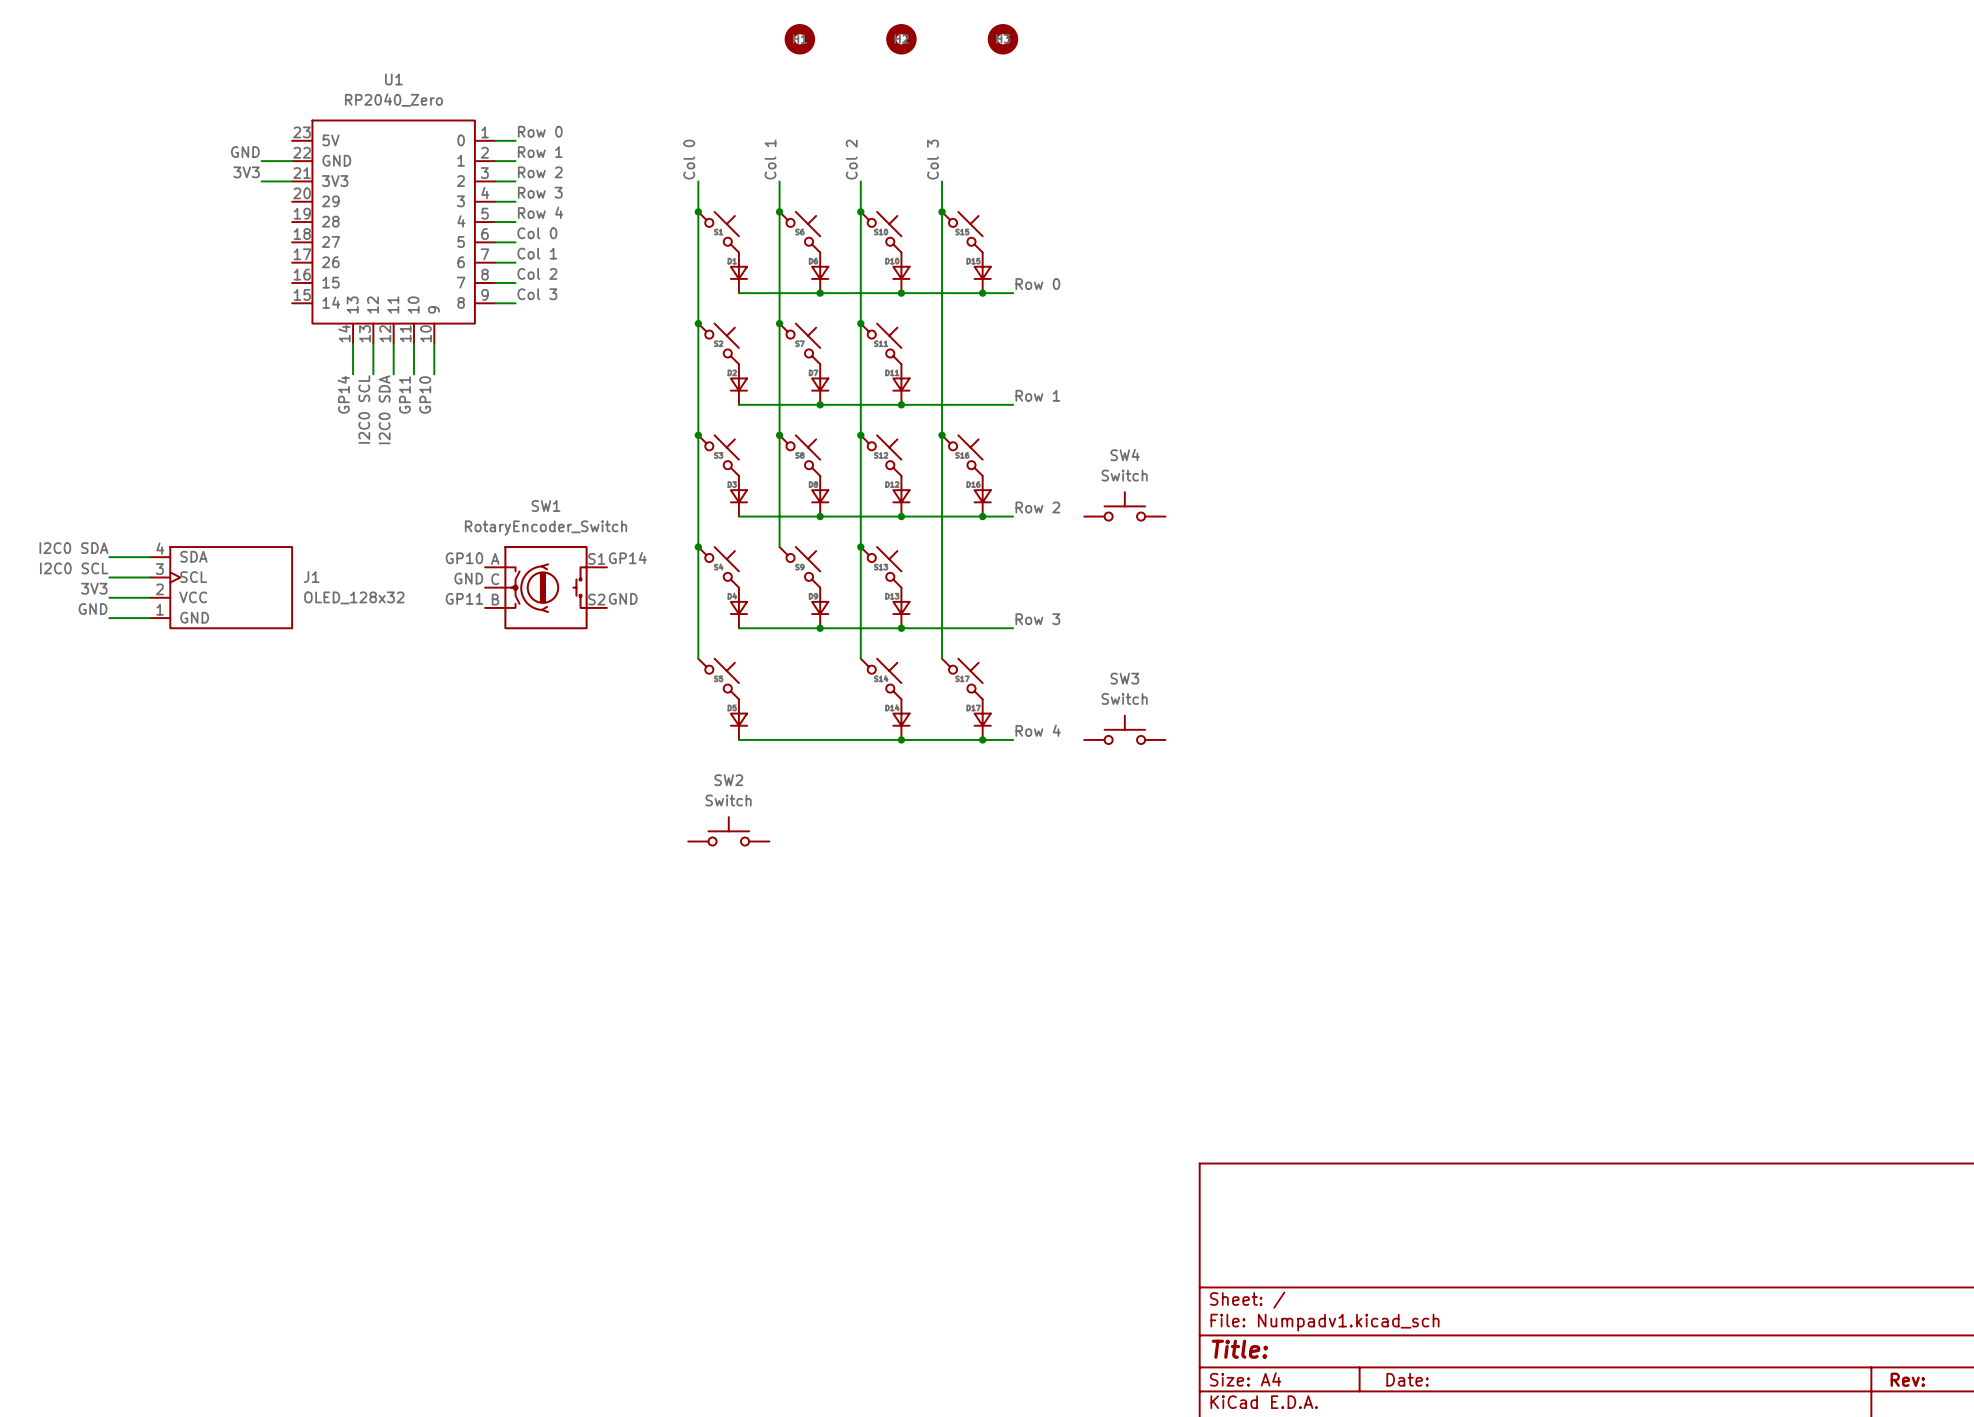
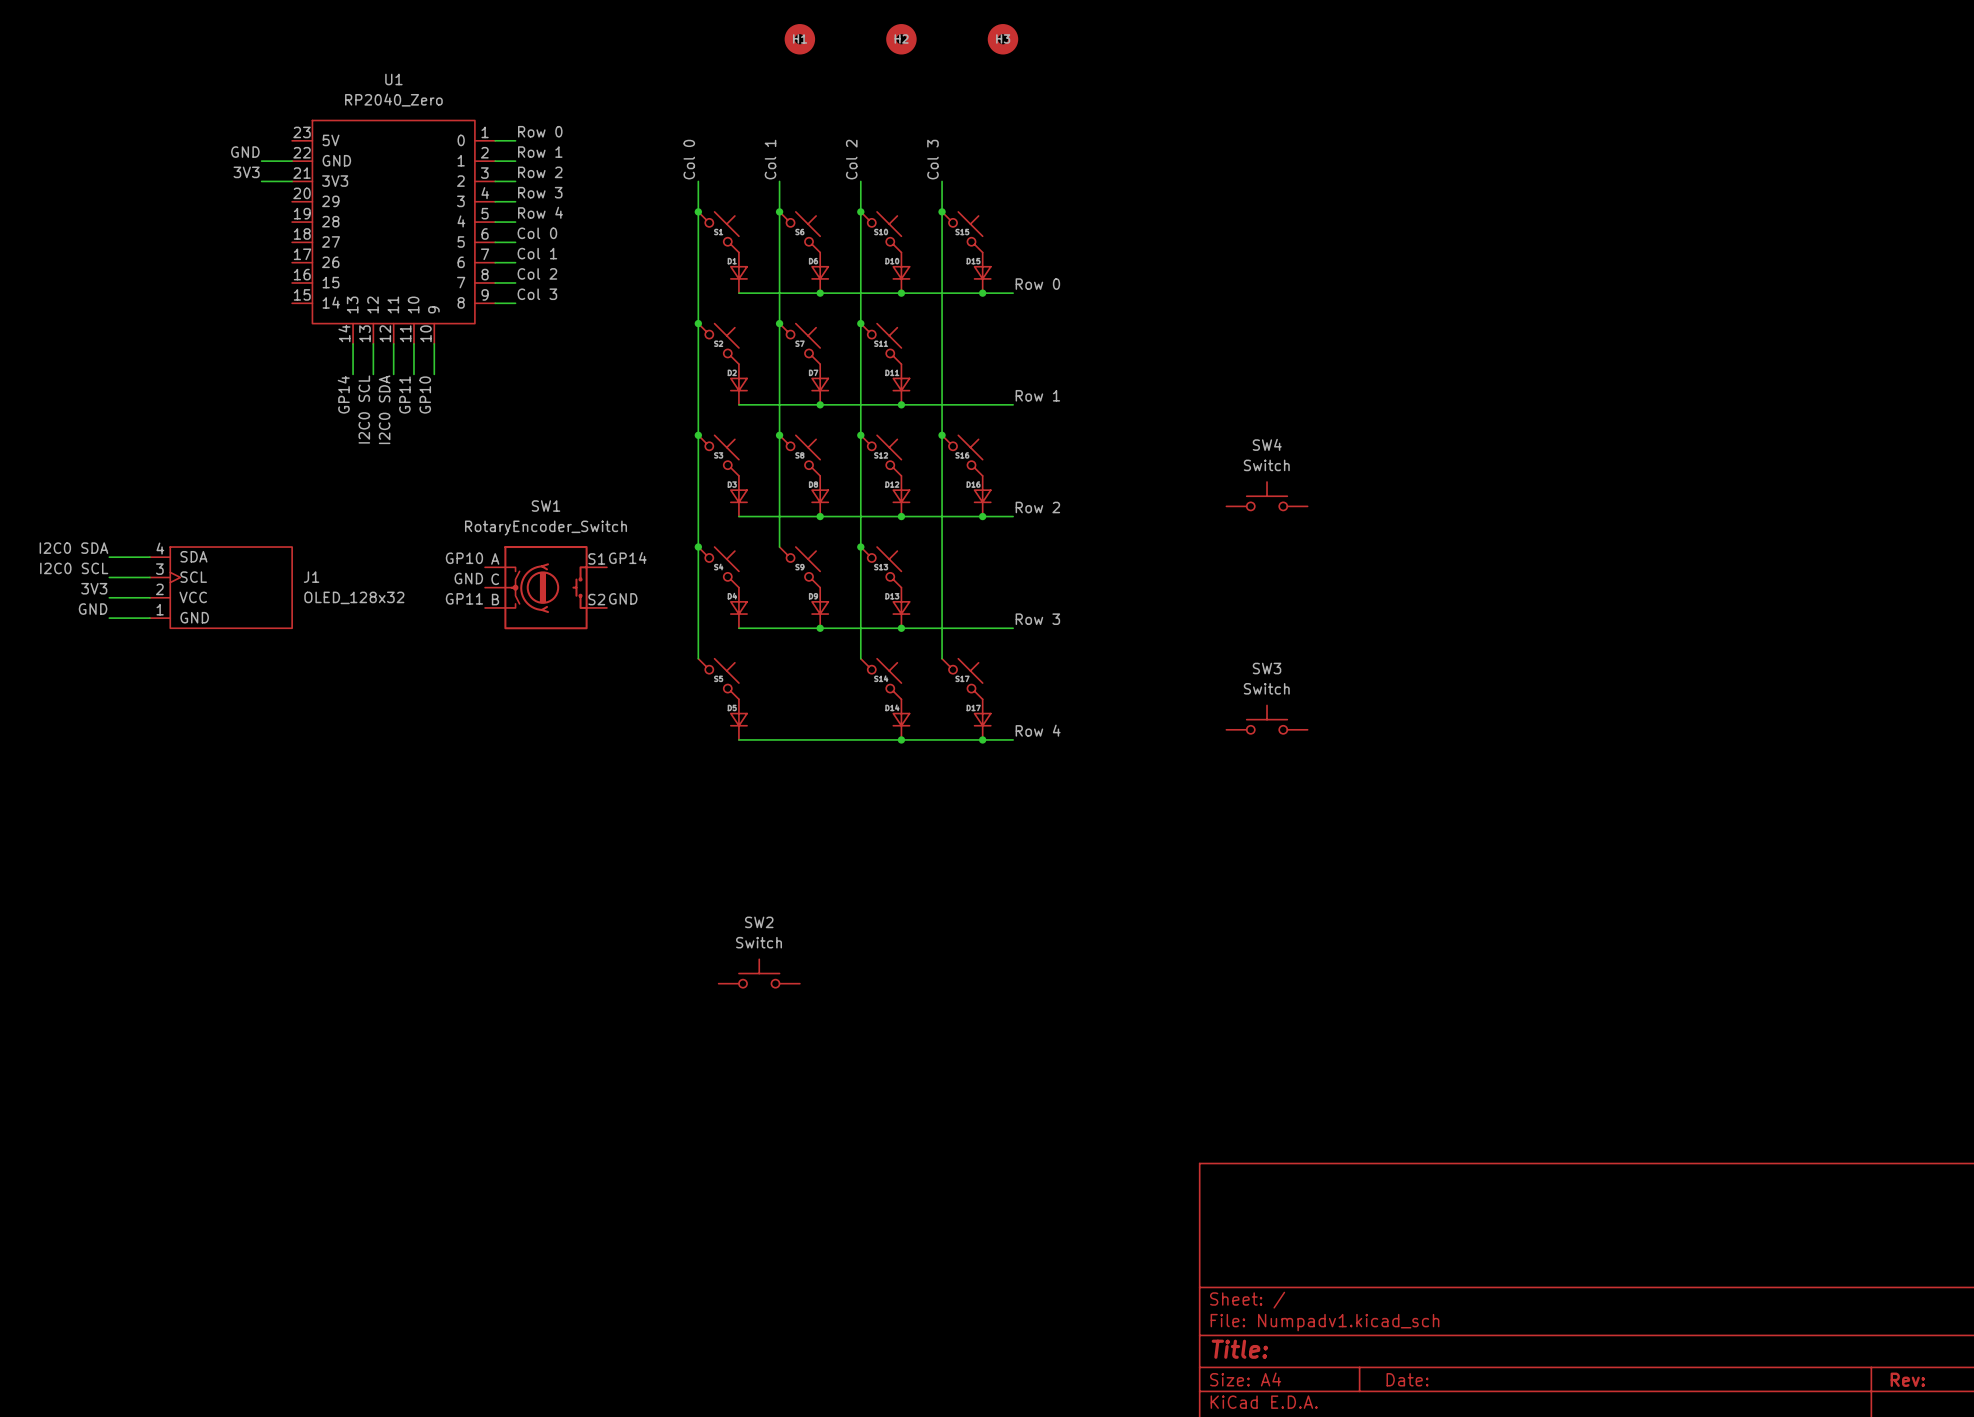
SW4 position: (1124, 506) -> (1267, 496)
SW3 position: (1124, 729) -> (1267, 719)
SW2 position: (728, 831) -> (759, 973)

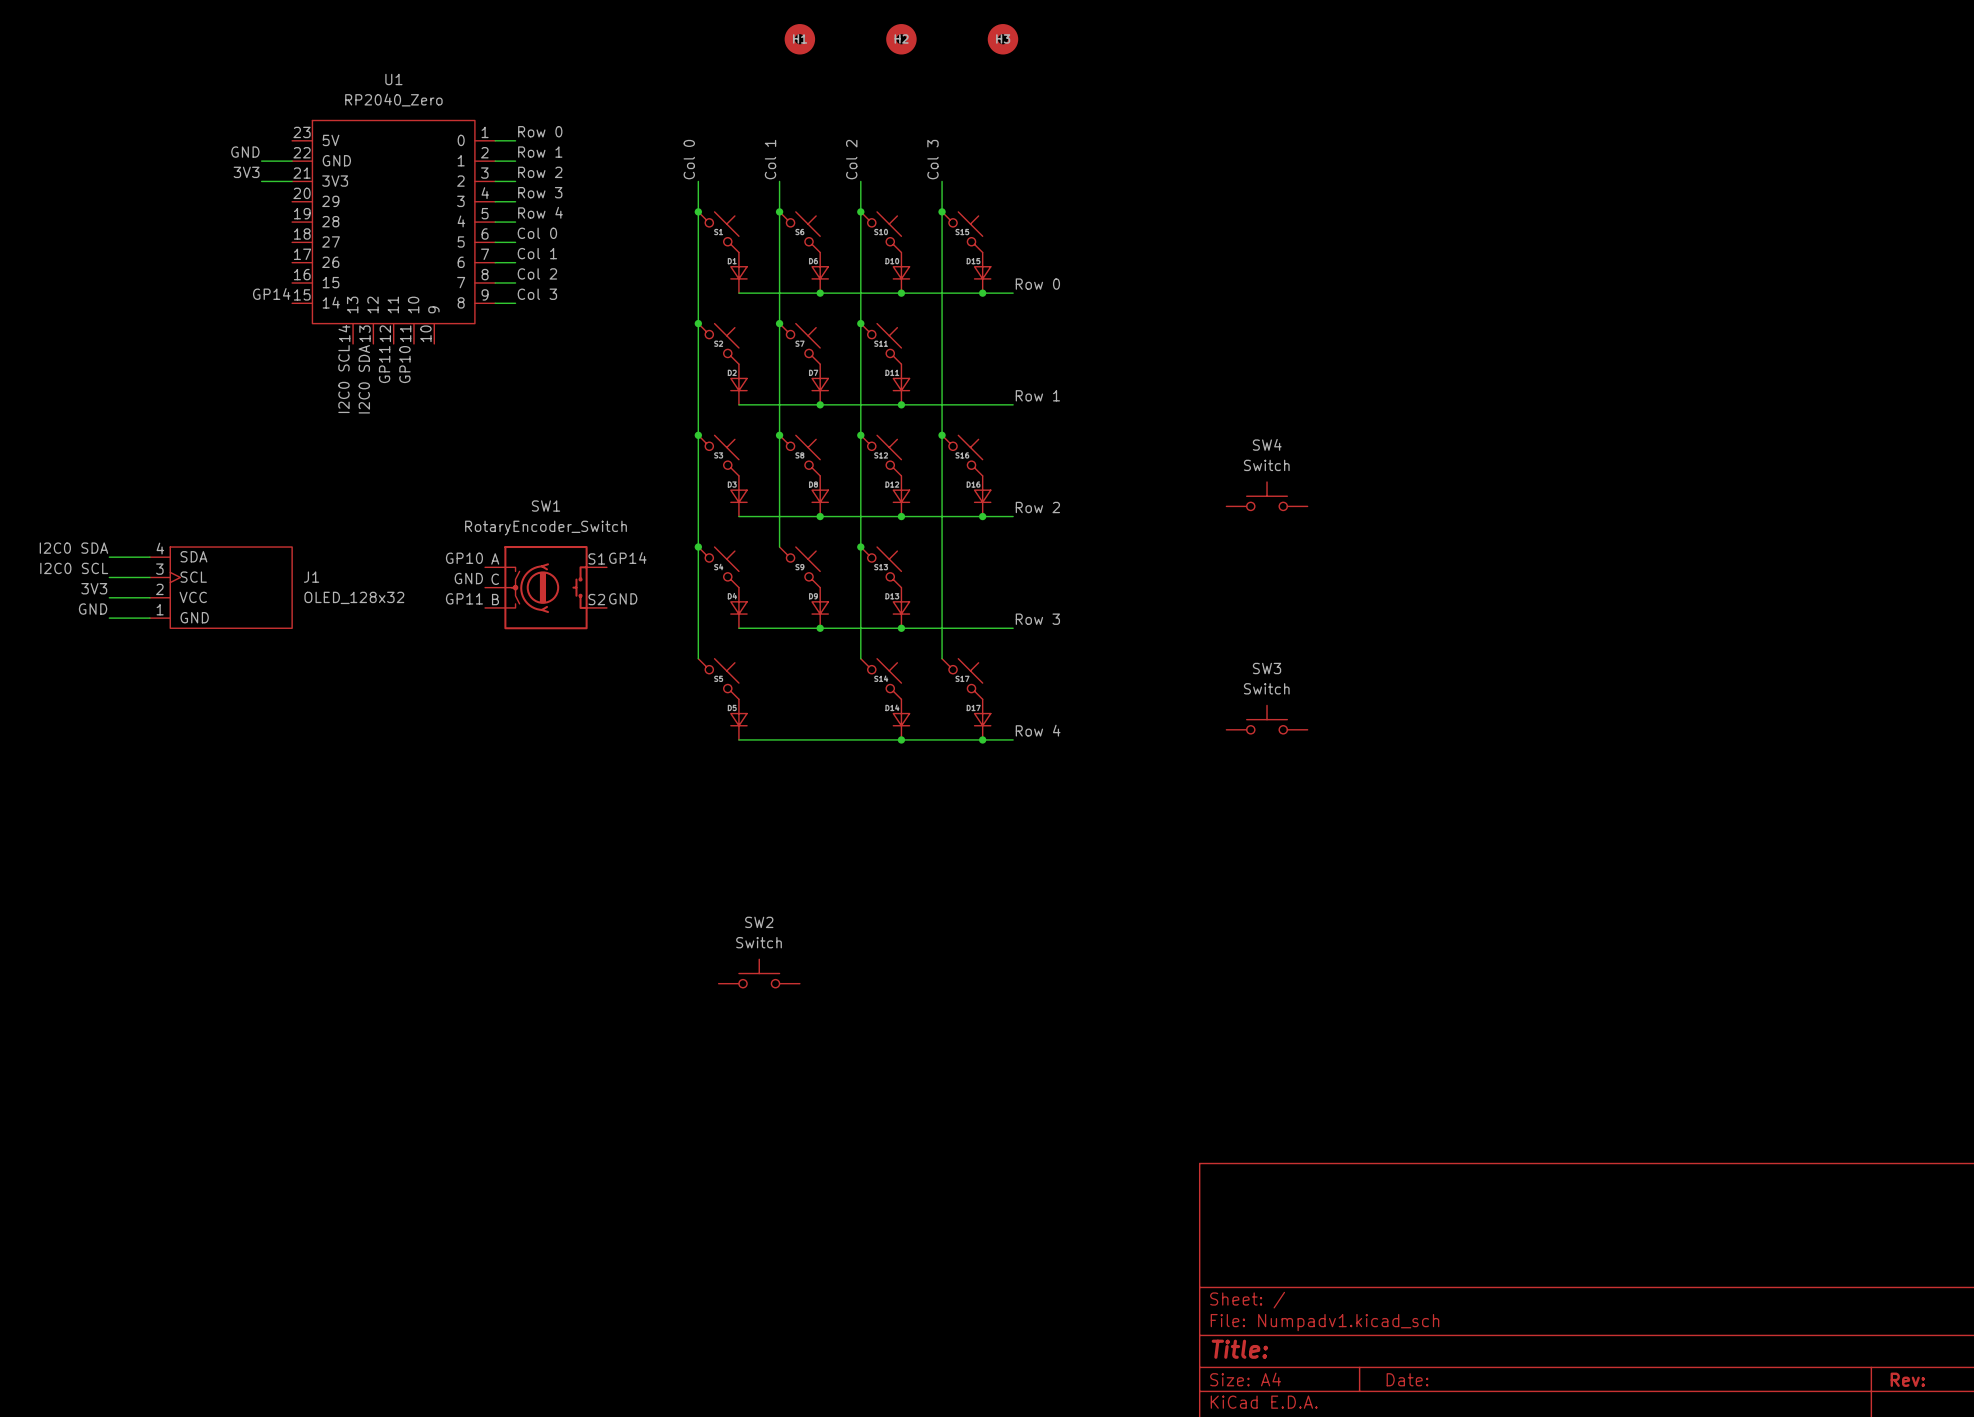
wire: (353, 343) (353, 374) -> none
wire: (373, 343) (373, 374) -> none
wire: (393, 343) (393, 374) -> none
wire: (413, 343) (413, 374) -> none
wire: (434, 343) (434, 374) -> none
label rotation: 0° (343, 394) -> 90° clockwise (271, 293)
label position: GP14 (343, 394) -> GP14 (271, 293)
label position: GP11 (404, 395) -> GP11 (384, 364)
label position: GP10 (425, 395) -> GP10 (404, 364)
label position: I2C0 SCL (364, 409) -> I2C0 SCL (343, 379)
label position: I2C0 SDA (384, 409) -> I2C0 SDA (364, 379)

